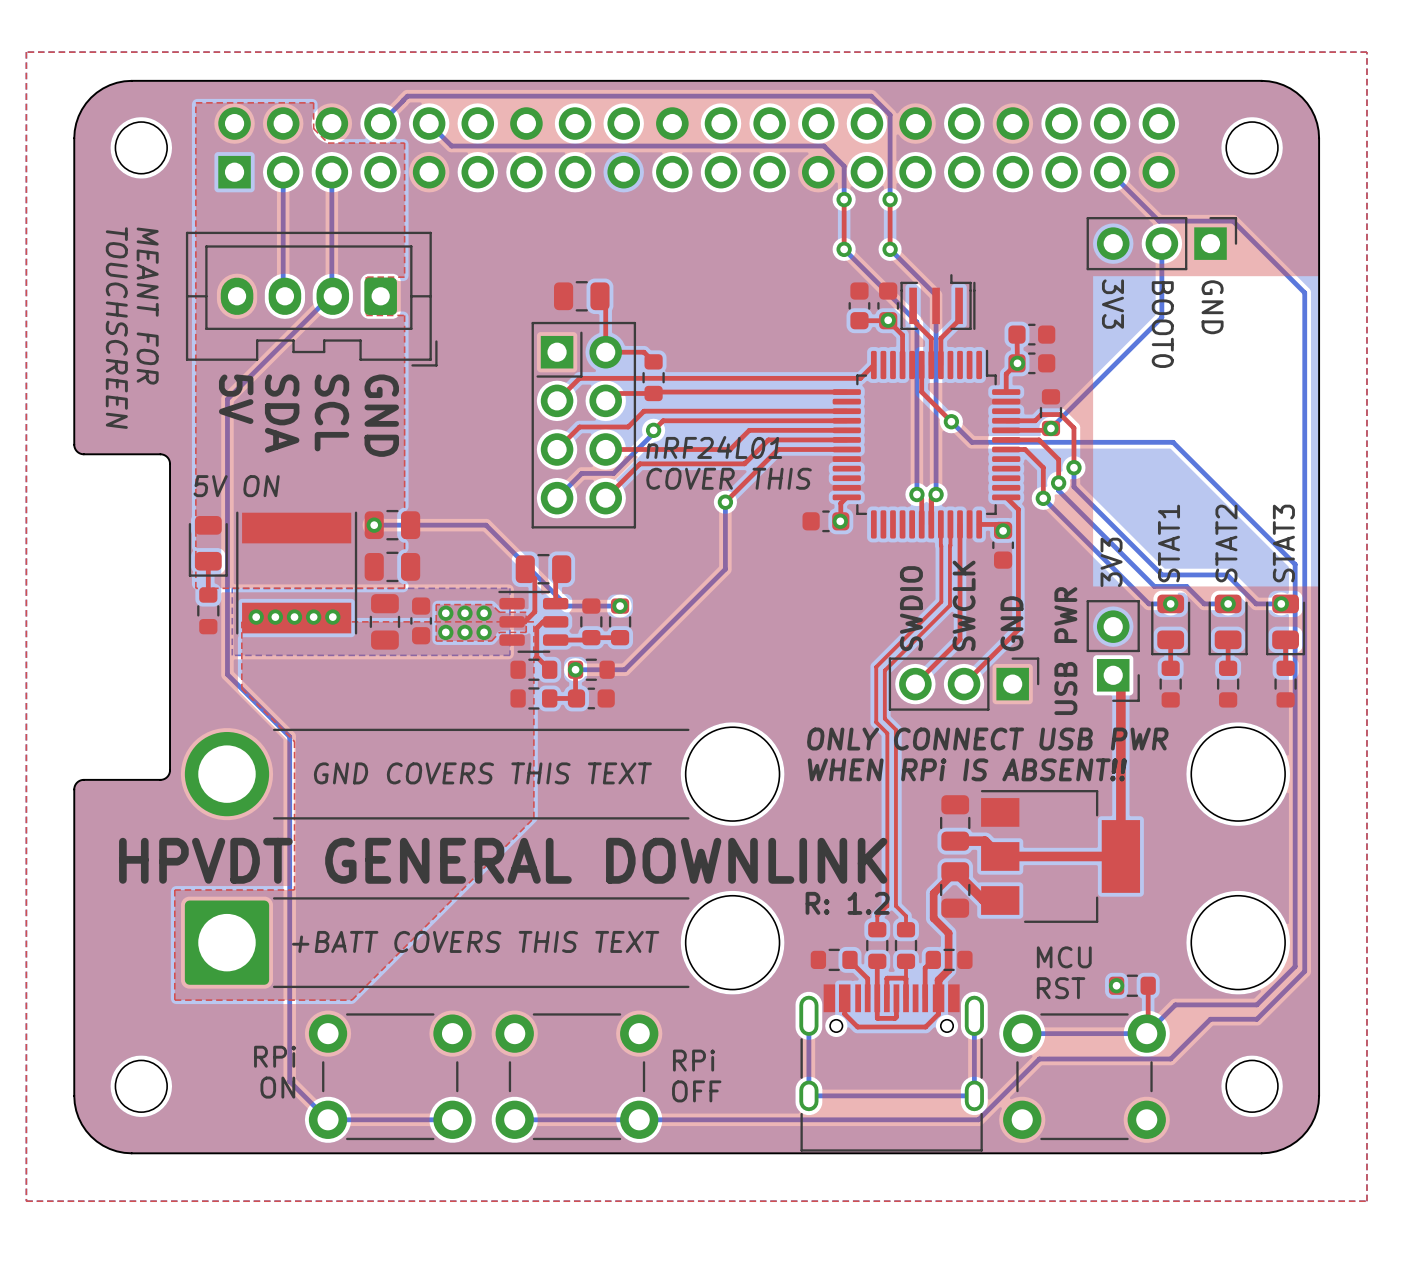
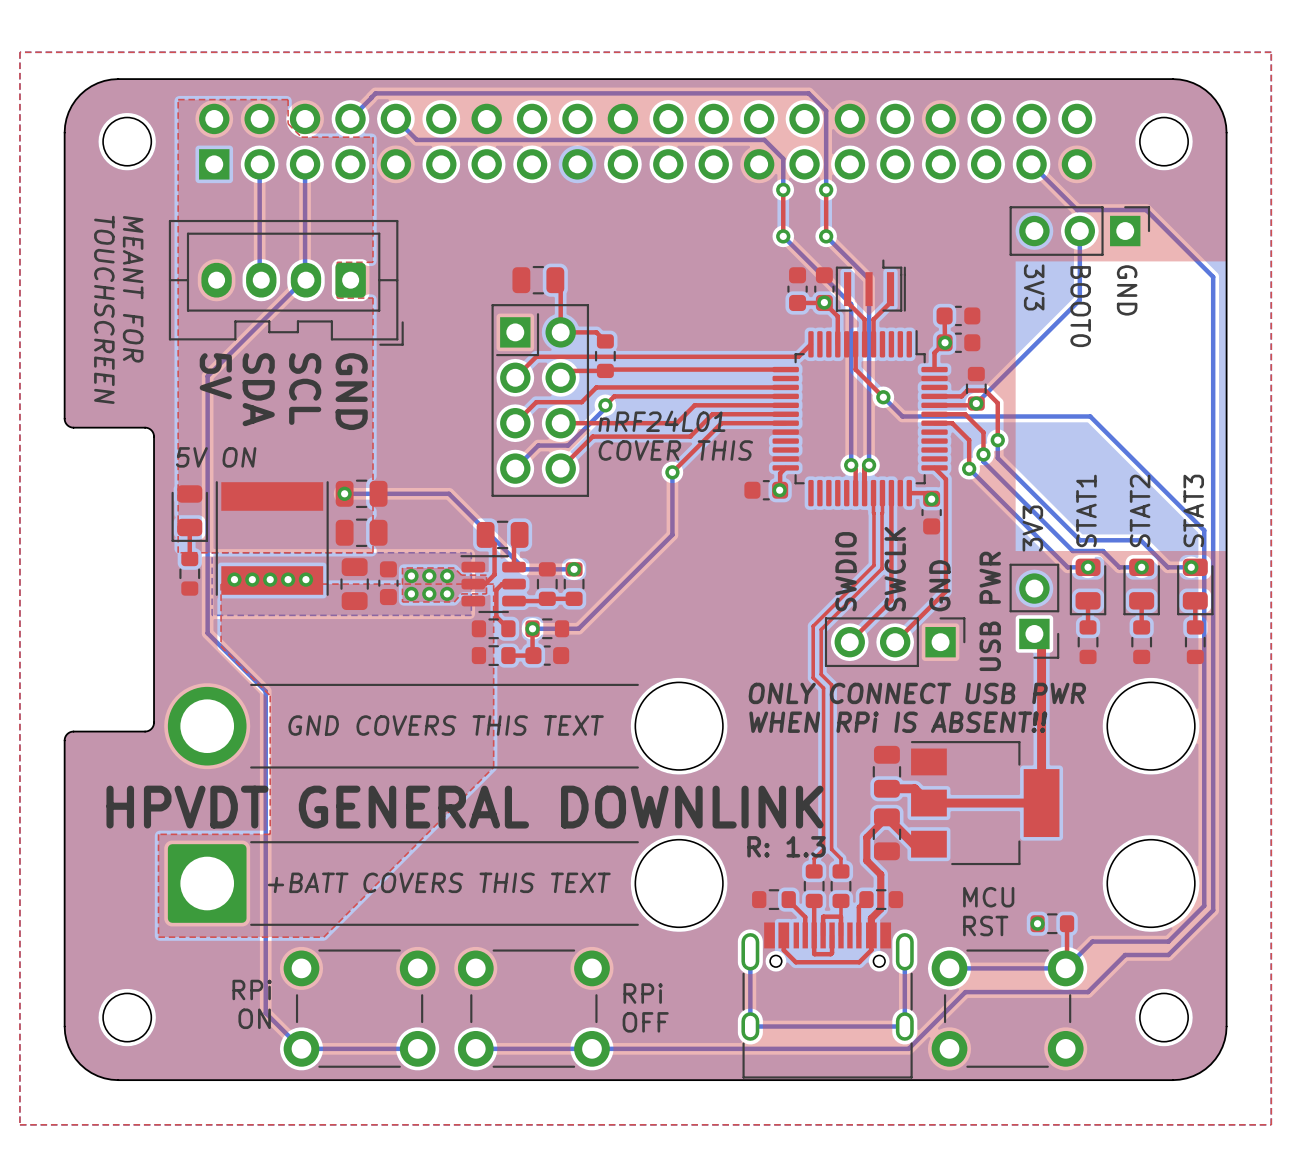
text: R: 1.2 (847, 903) -> R: 1.3 (786, 846)

